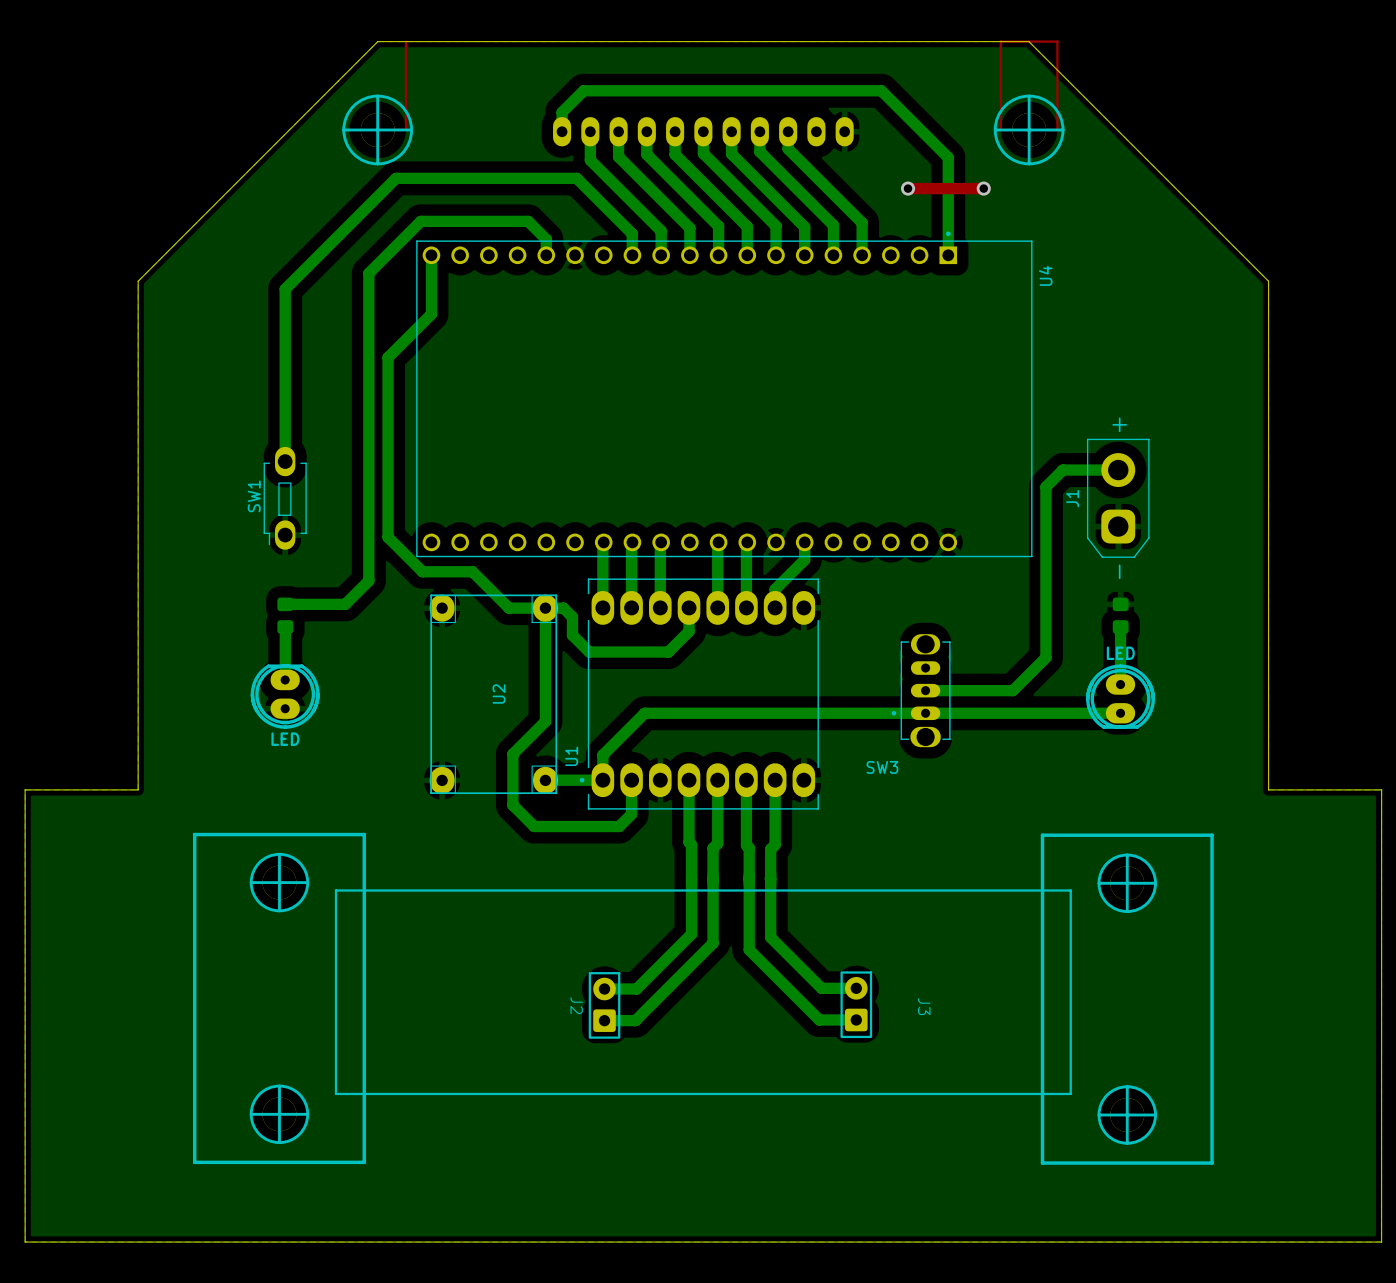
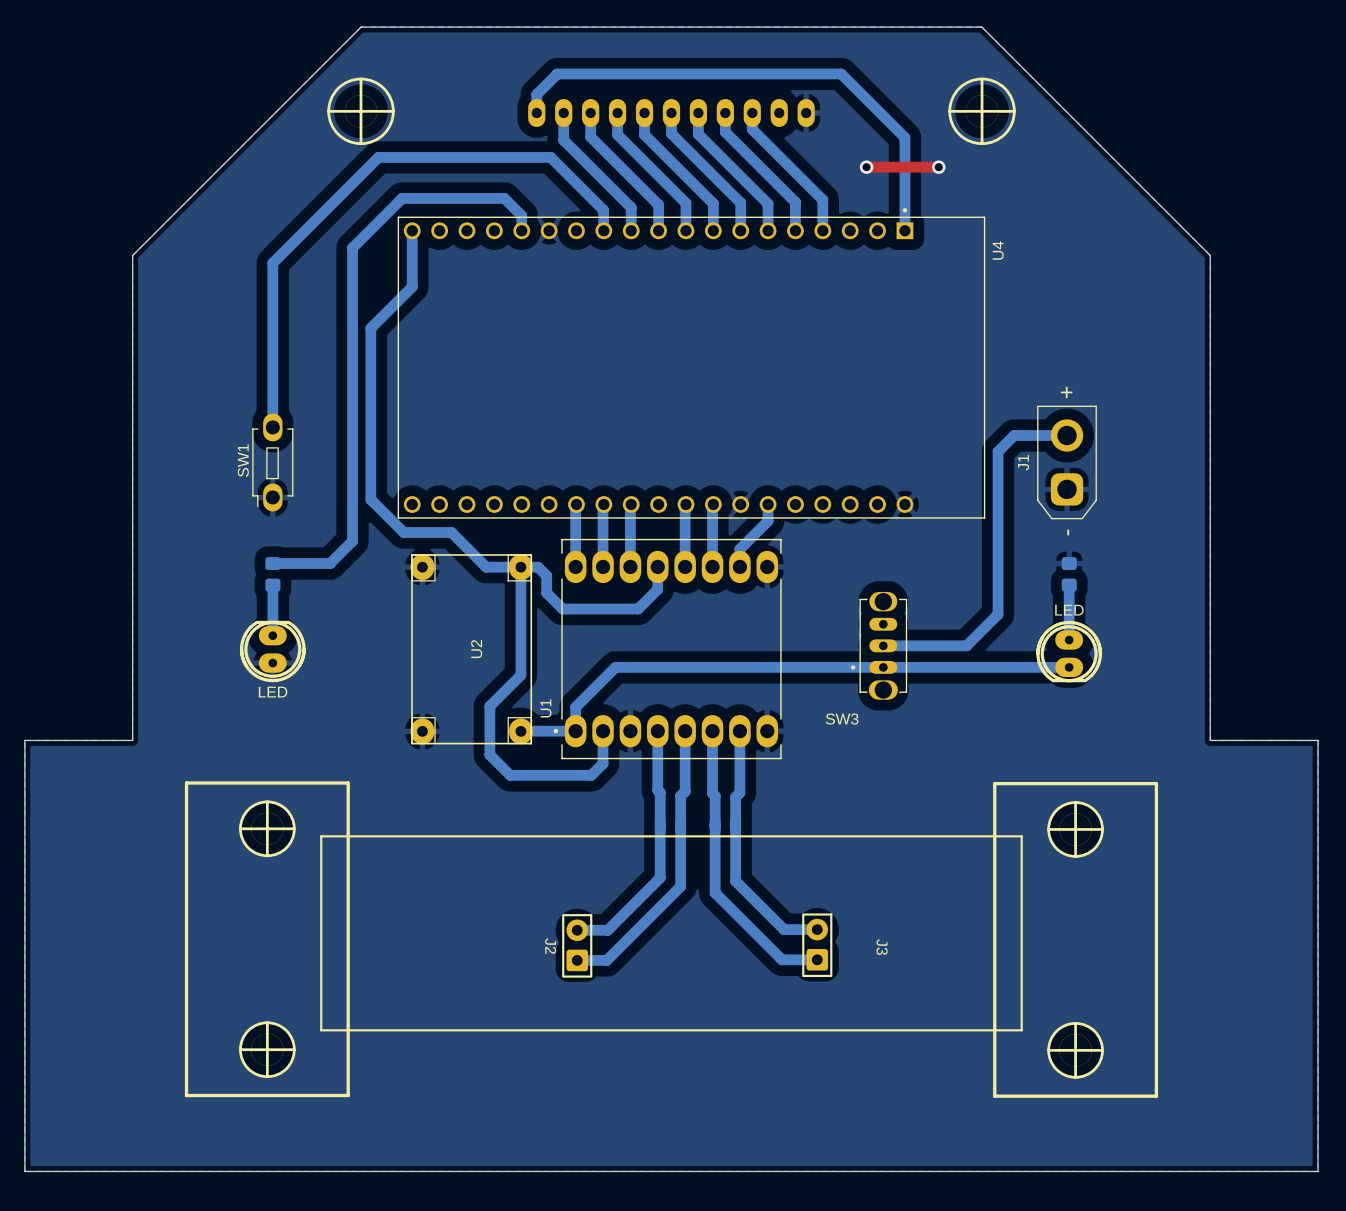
top track: (405, 41) (405, 129) -> none
top track: (1000, 129) (1000, 41) (1057, 41) (1057, 129) -> none

